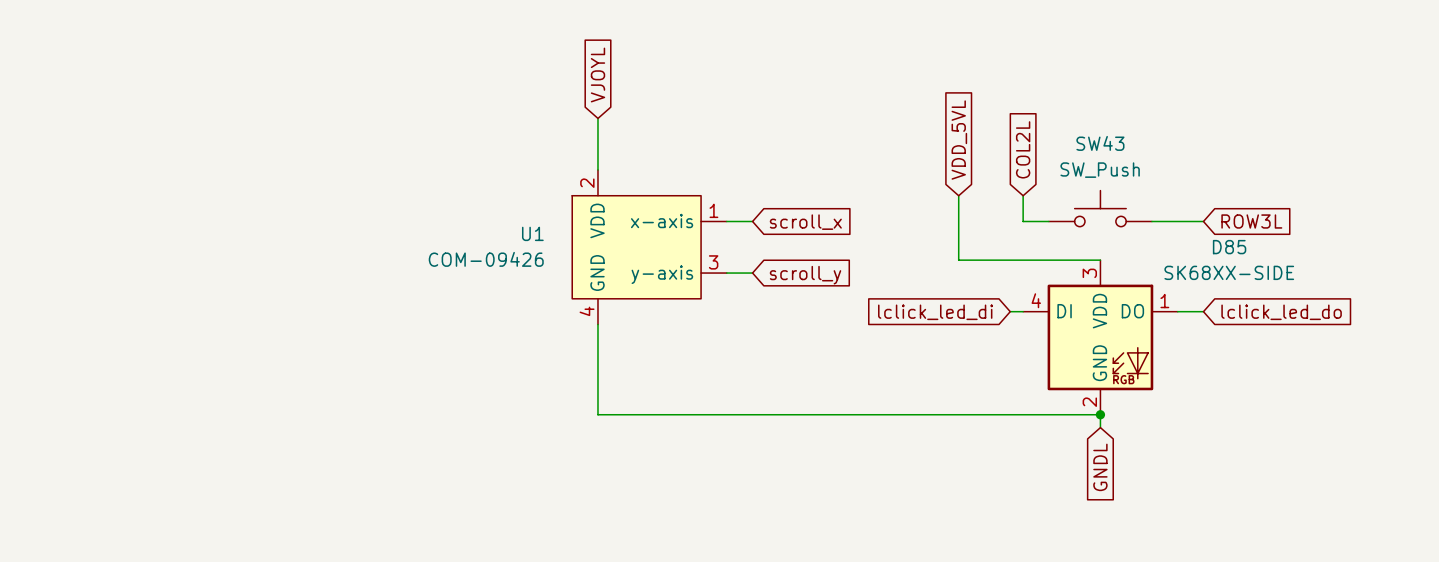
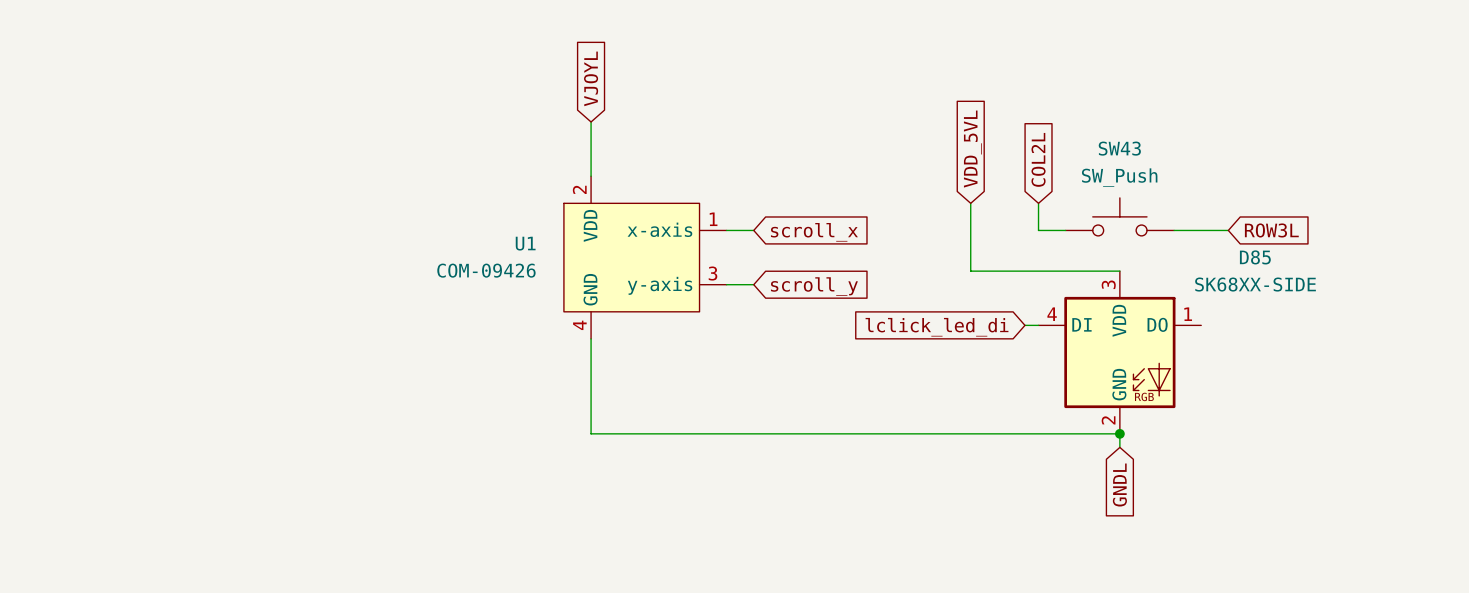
wire: (1177, 311) (1203, 311) -> none
global label: lclick_led_do (1281, 312) -> none

